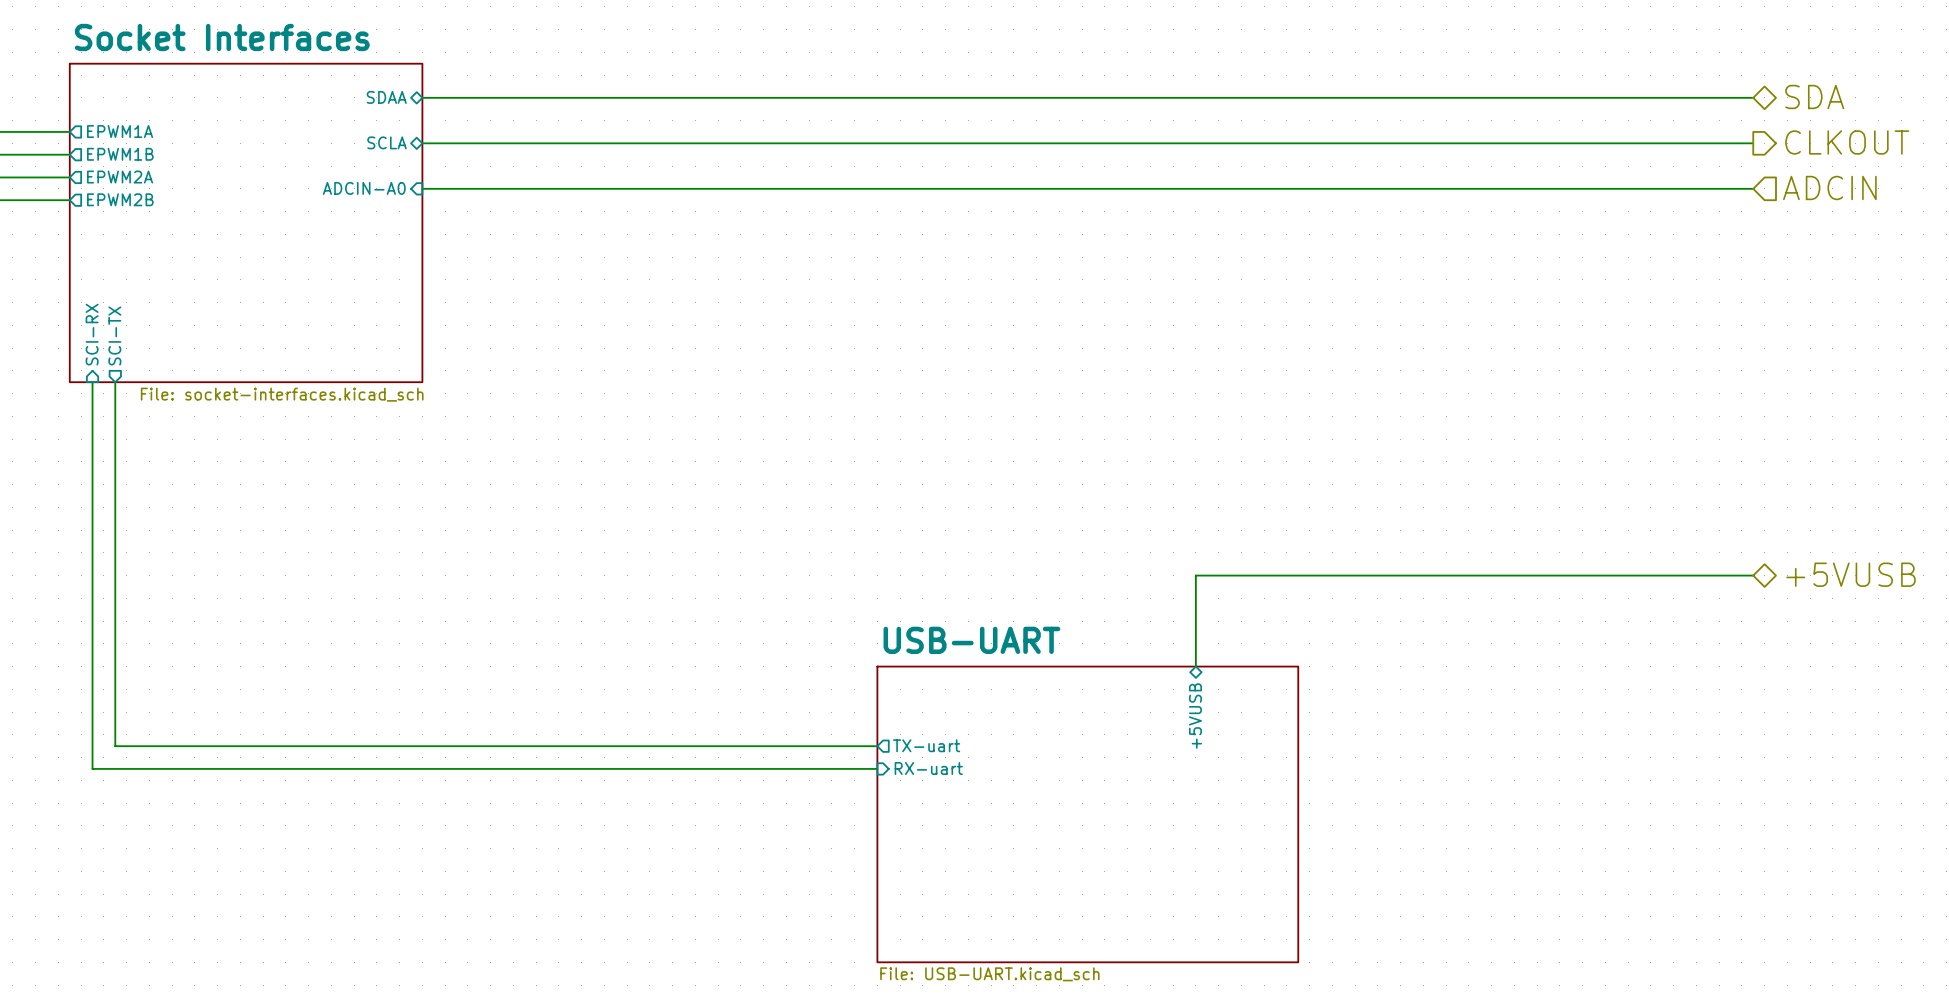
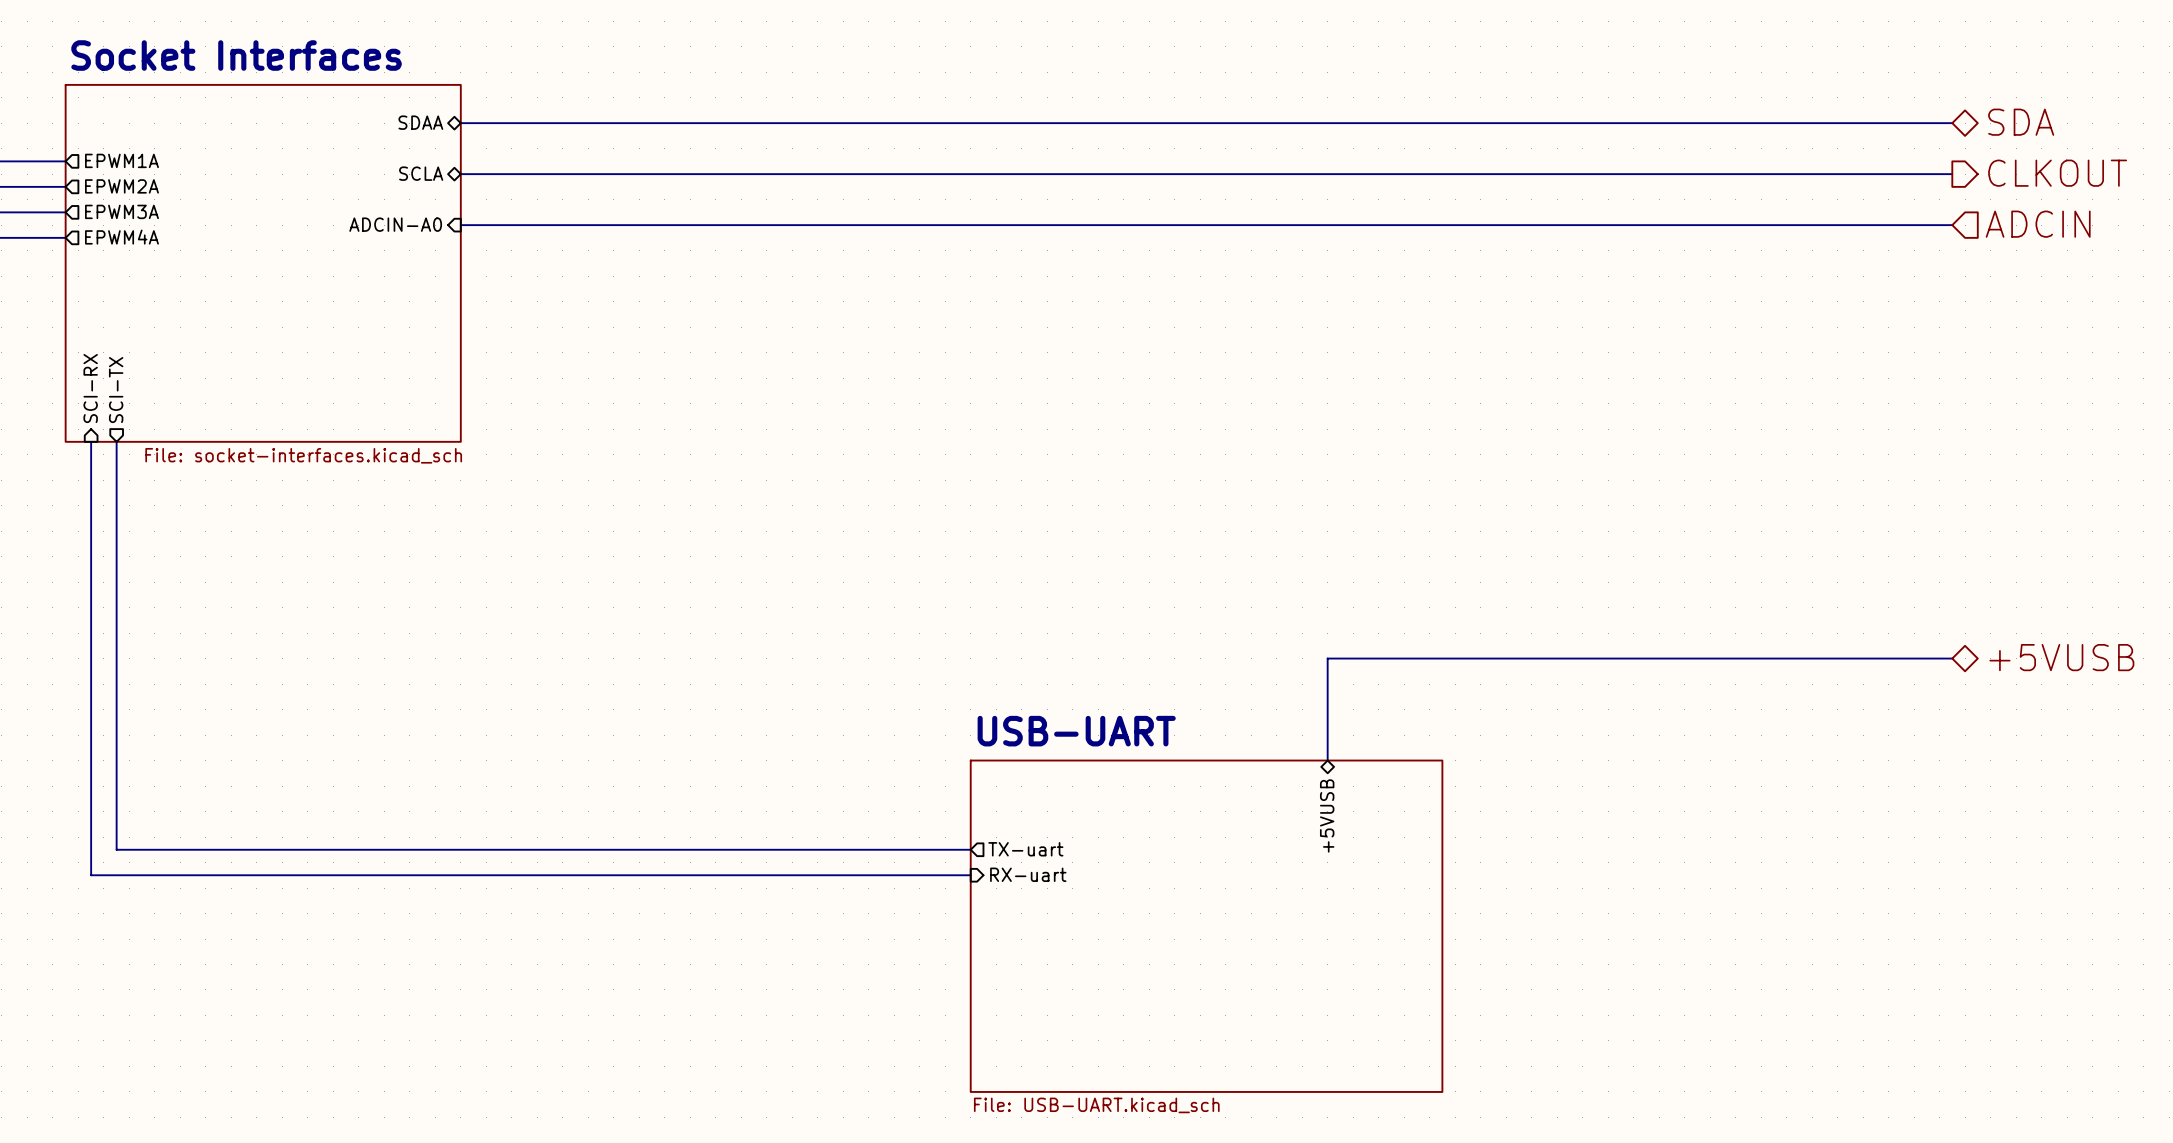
sheet pin: EPWM1B (120, 154) -> EPWM2A (121, 186)
sheet pin: EPWM2A (120, 177) -> EPWM3A (121, 211)
sheet pin: EPWM2B (120, 199) -> EPWM4A (121, 237)

